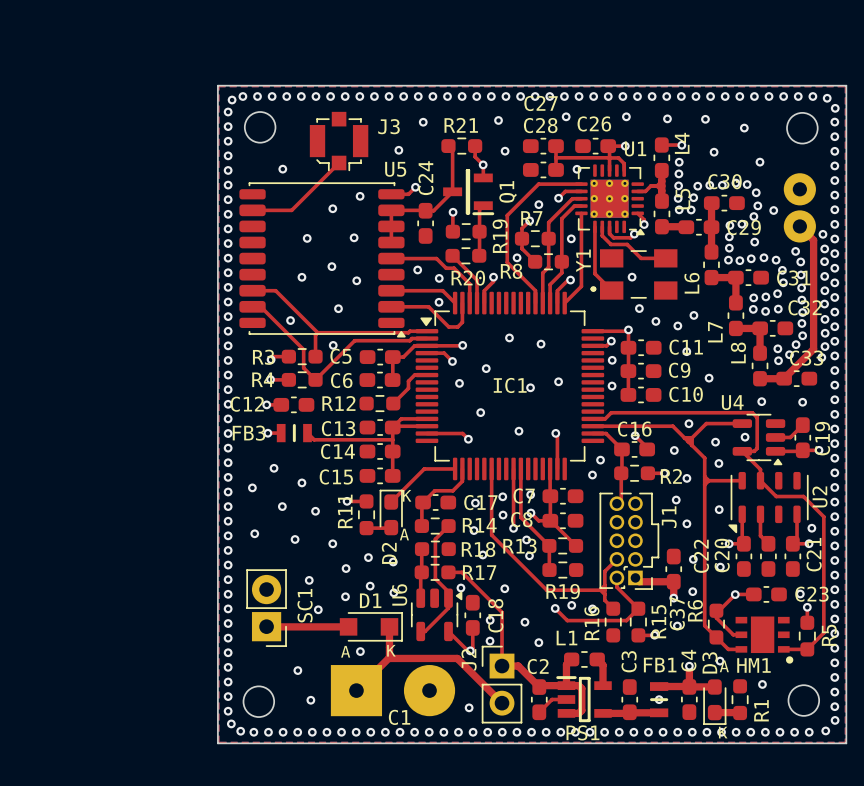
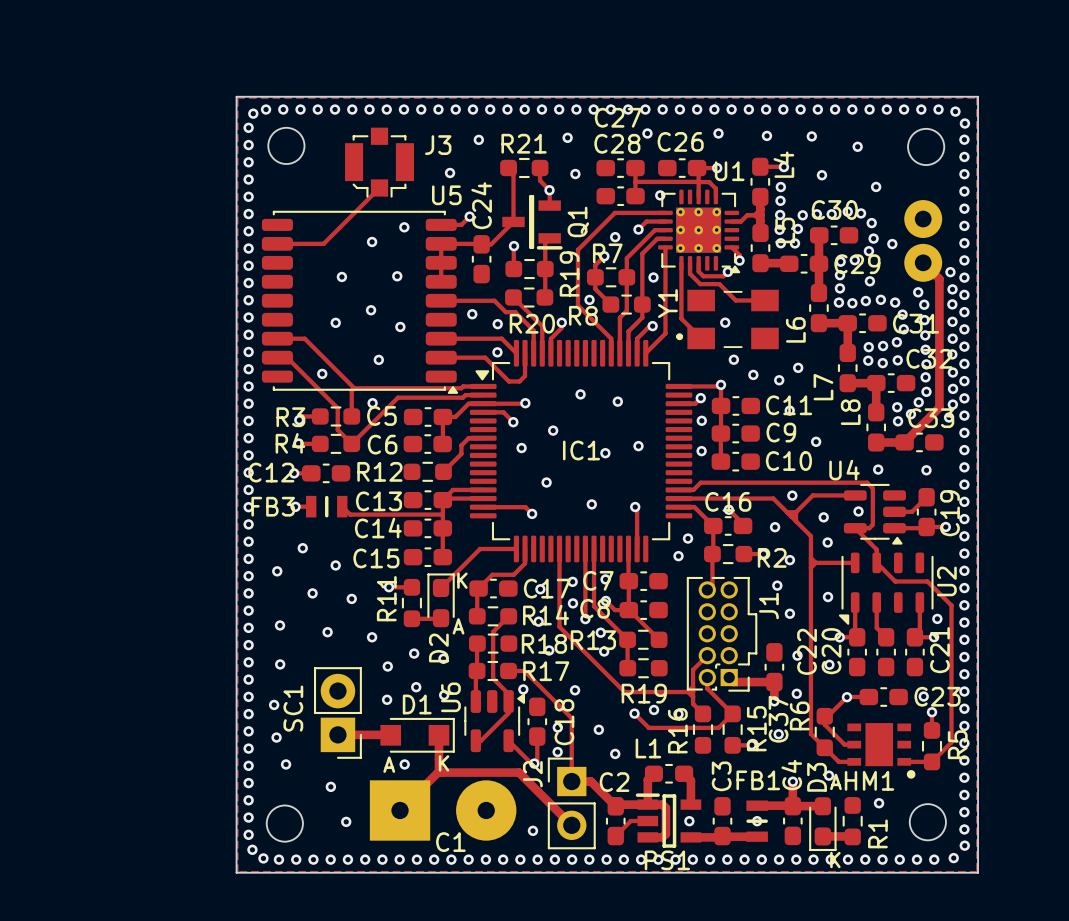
via: (282, 169) -> none
via: none -> (280, 664)
via: (309, 580) -> none
via: none -> (274, 704)
SC1 name position: SC1 (305, 605) -> SC1 (293, 708)
SC1 position: (266, 608) -> (337, 712)
via: (318, 609) -> none
top track: (266, 626) (348, 626) -> (337, 734) (390, 735)
via: none -> (276, 737)
via: none -> (286, 764)
via: none -> (689, 821)

